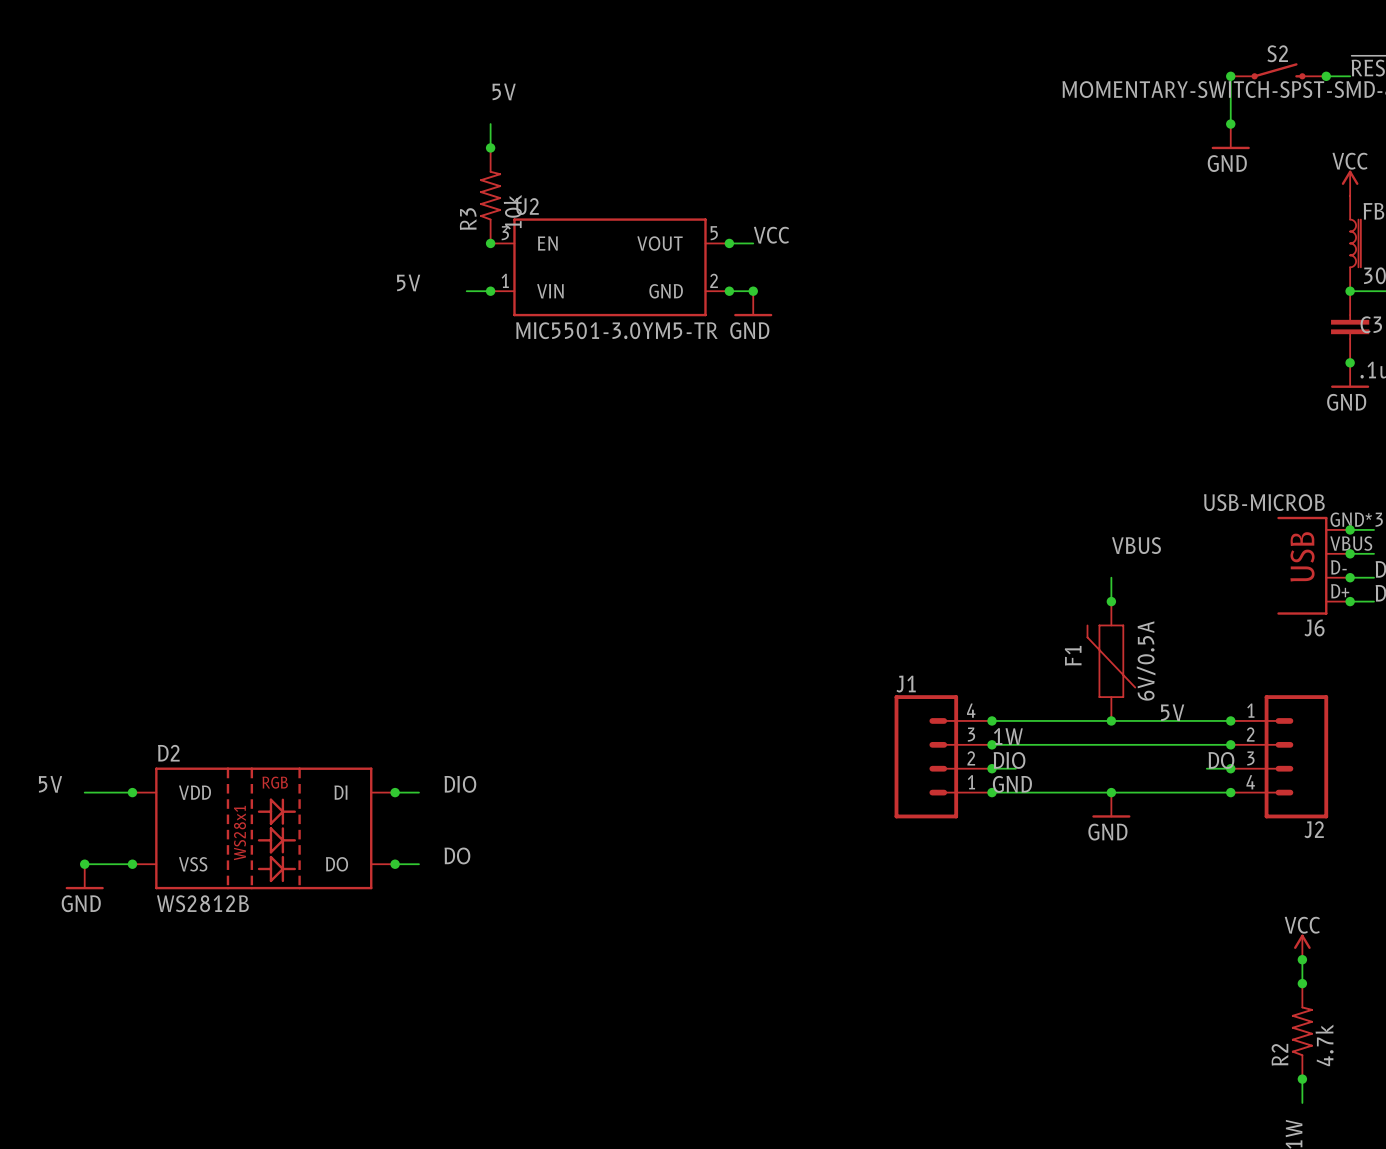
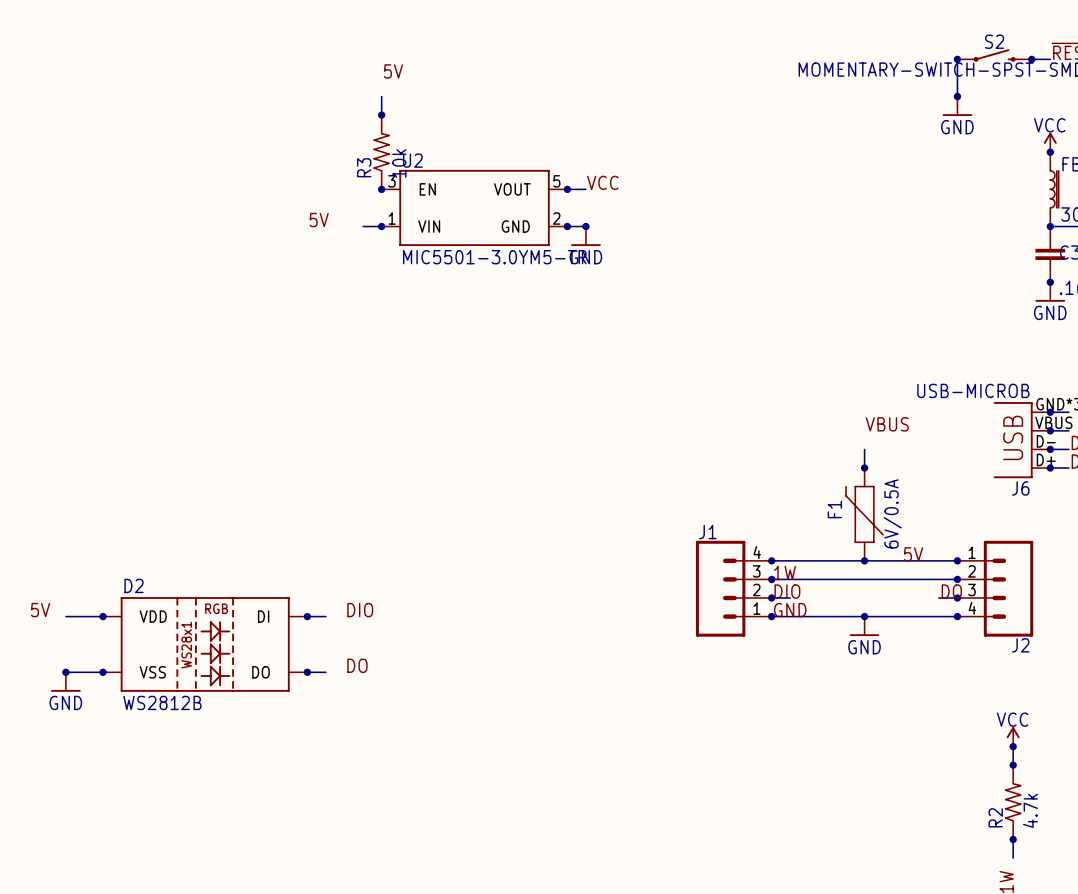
junction: none -> (1050, 152)

